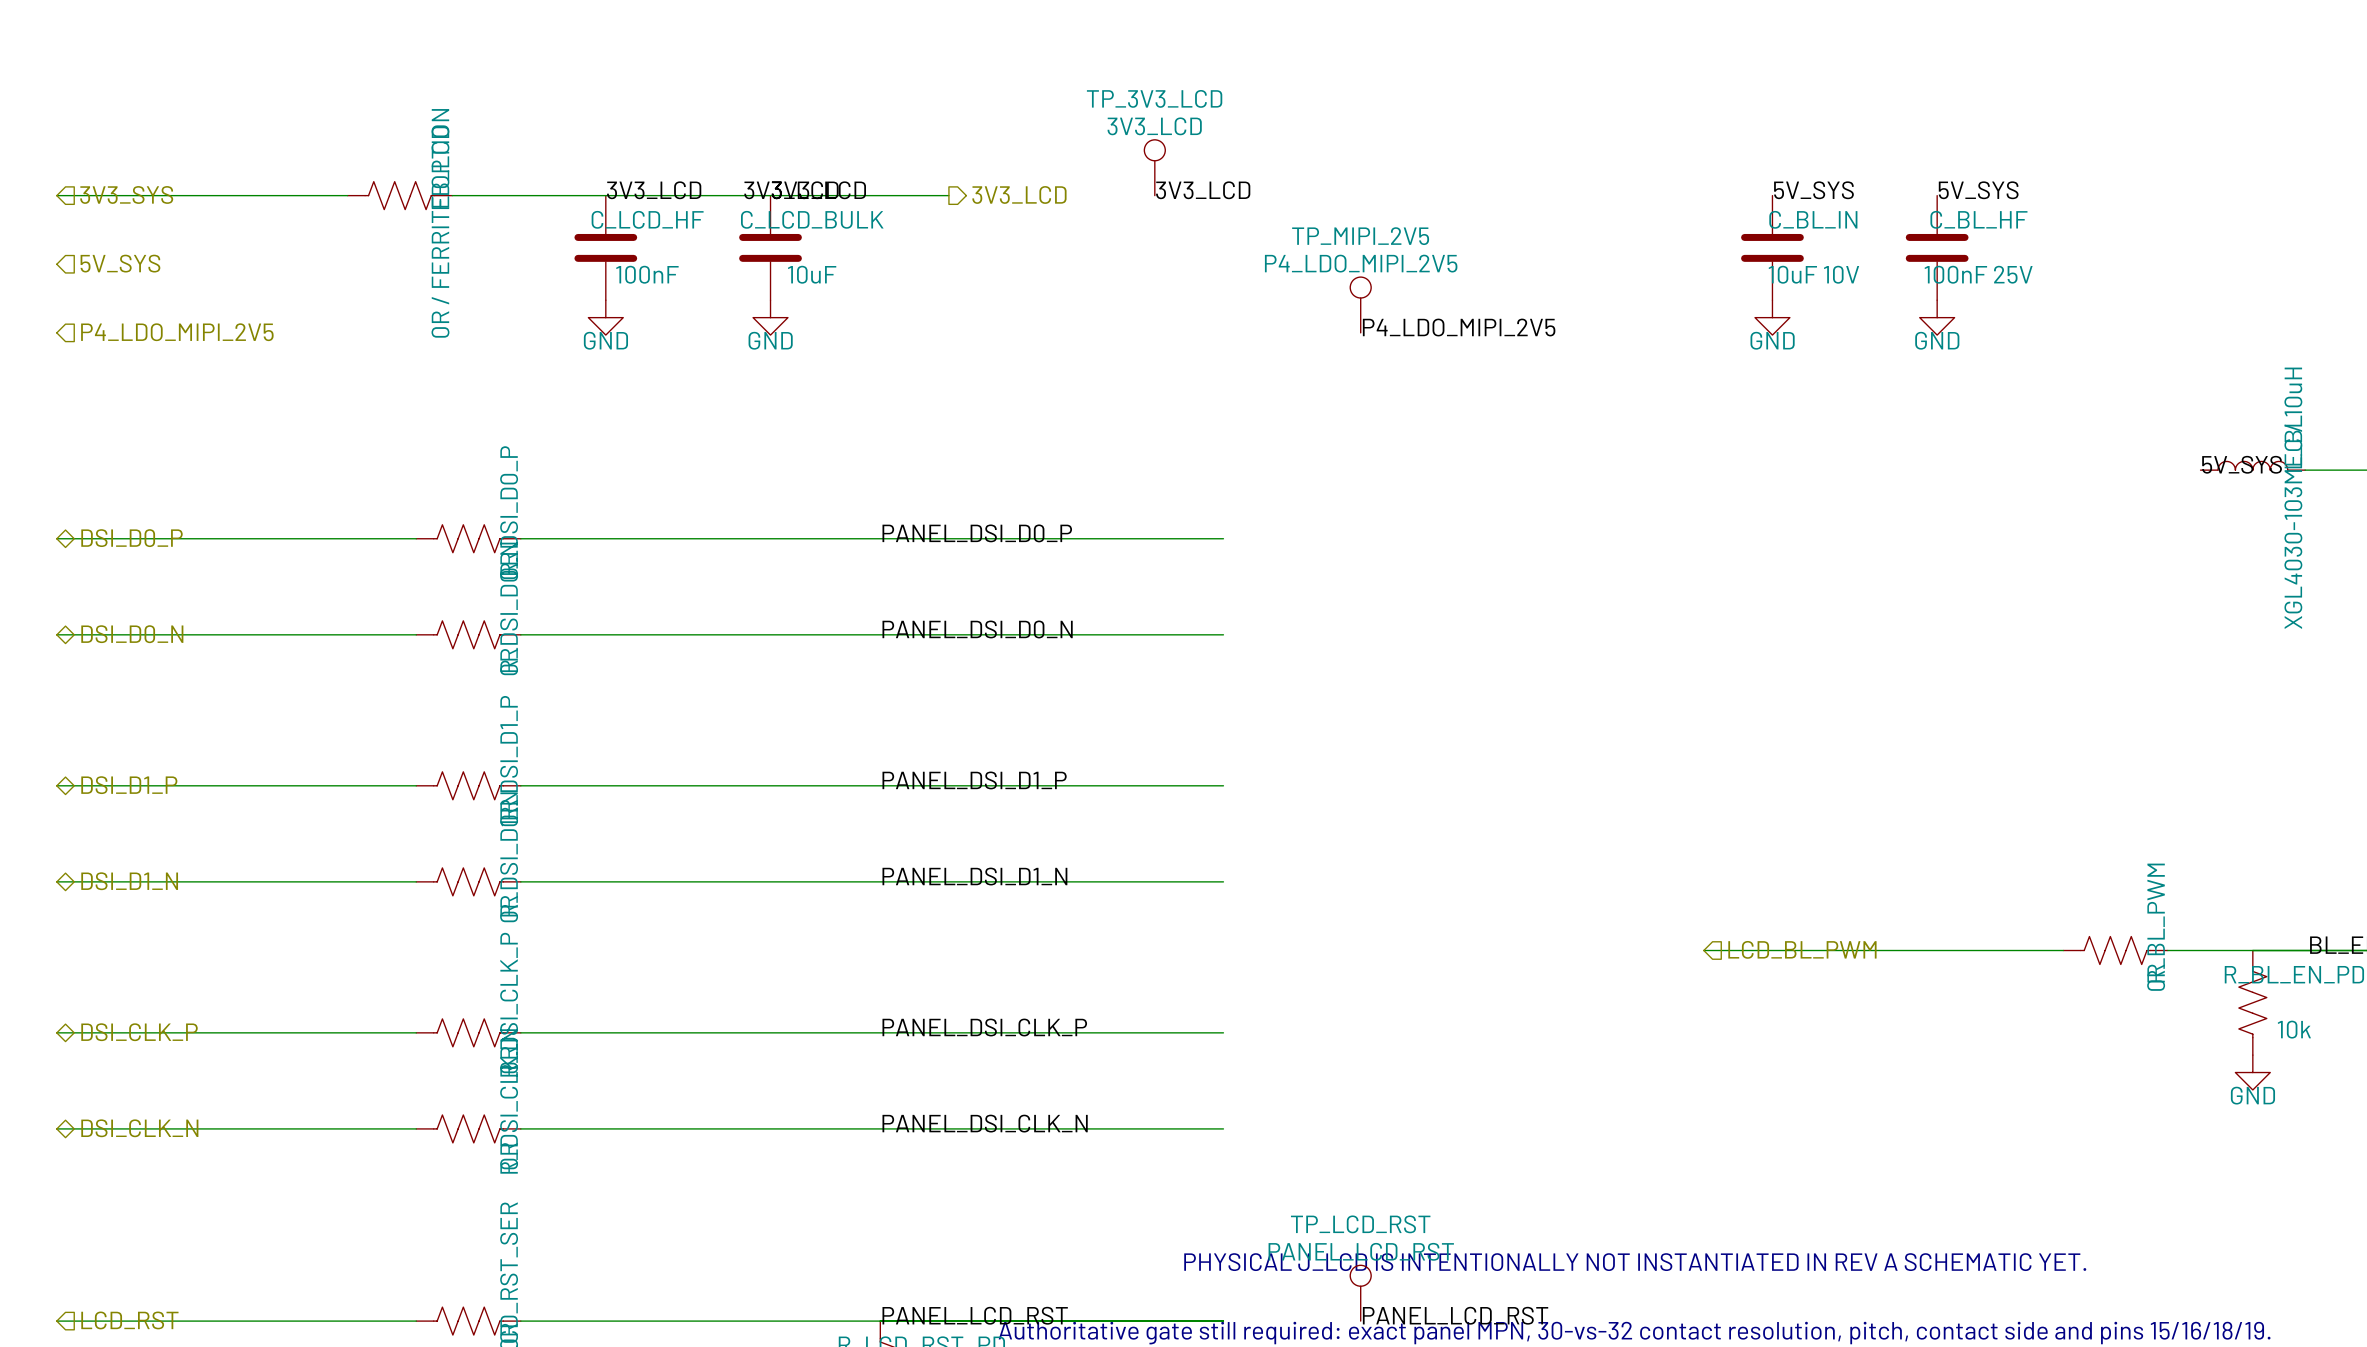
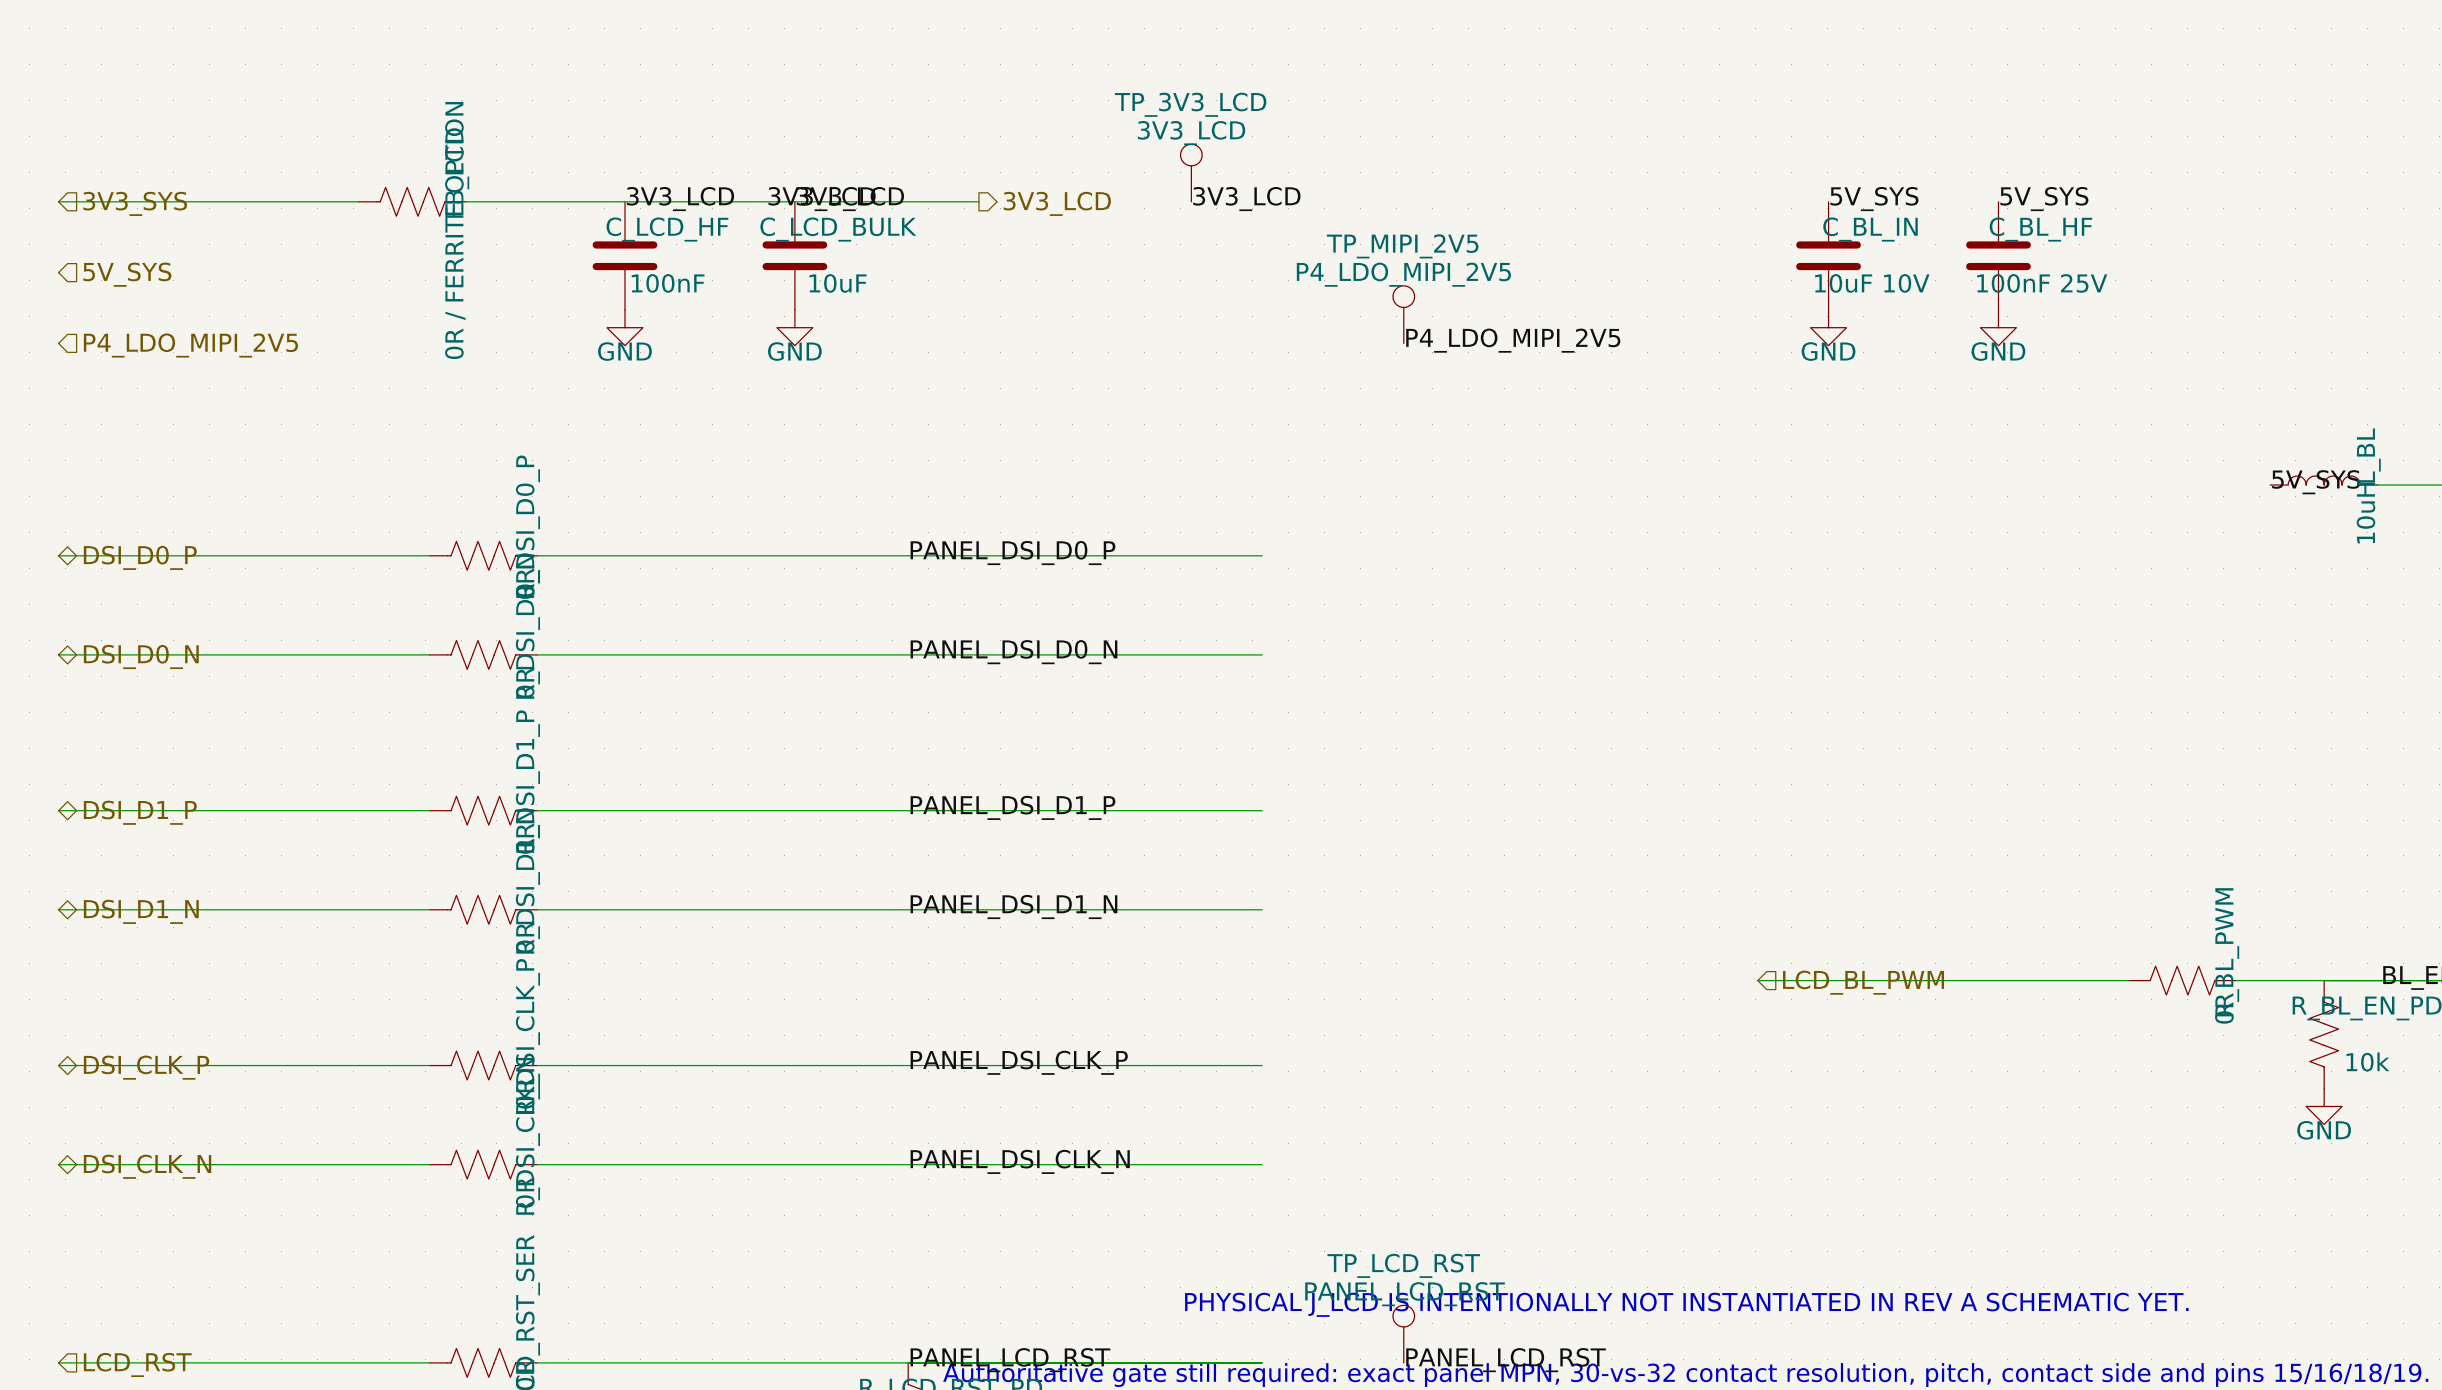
L_BL value: XGL4030-103MEC / 10uH (2293, 498) -> 10uH (2365, 513)

